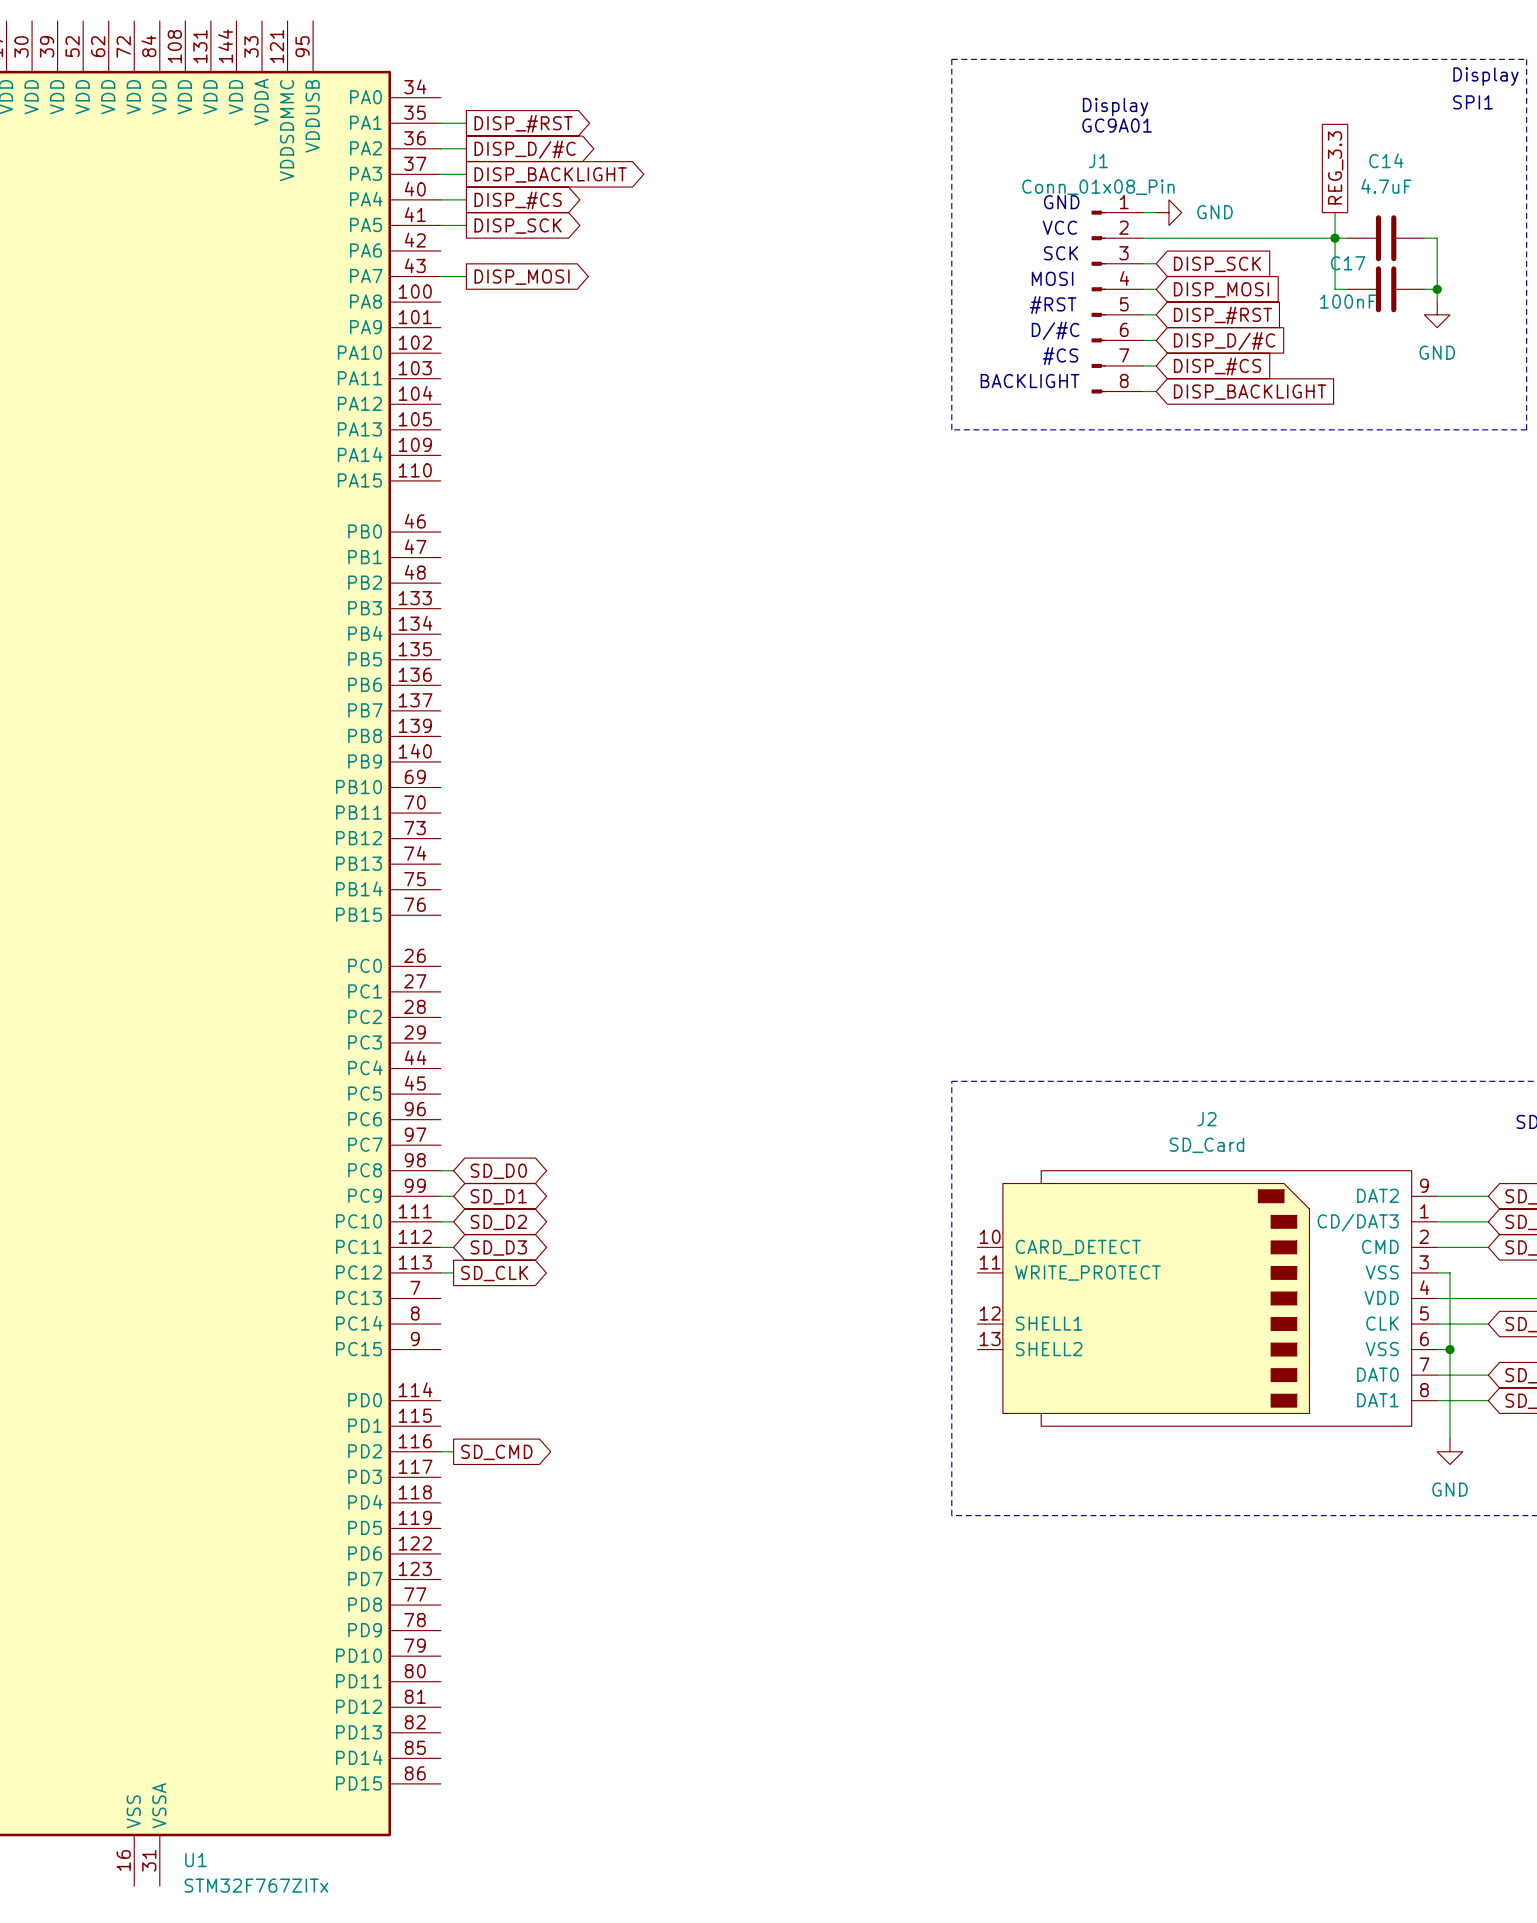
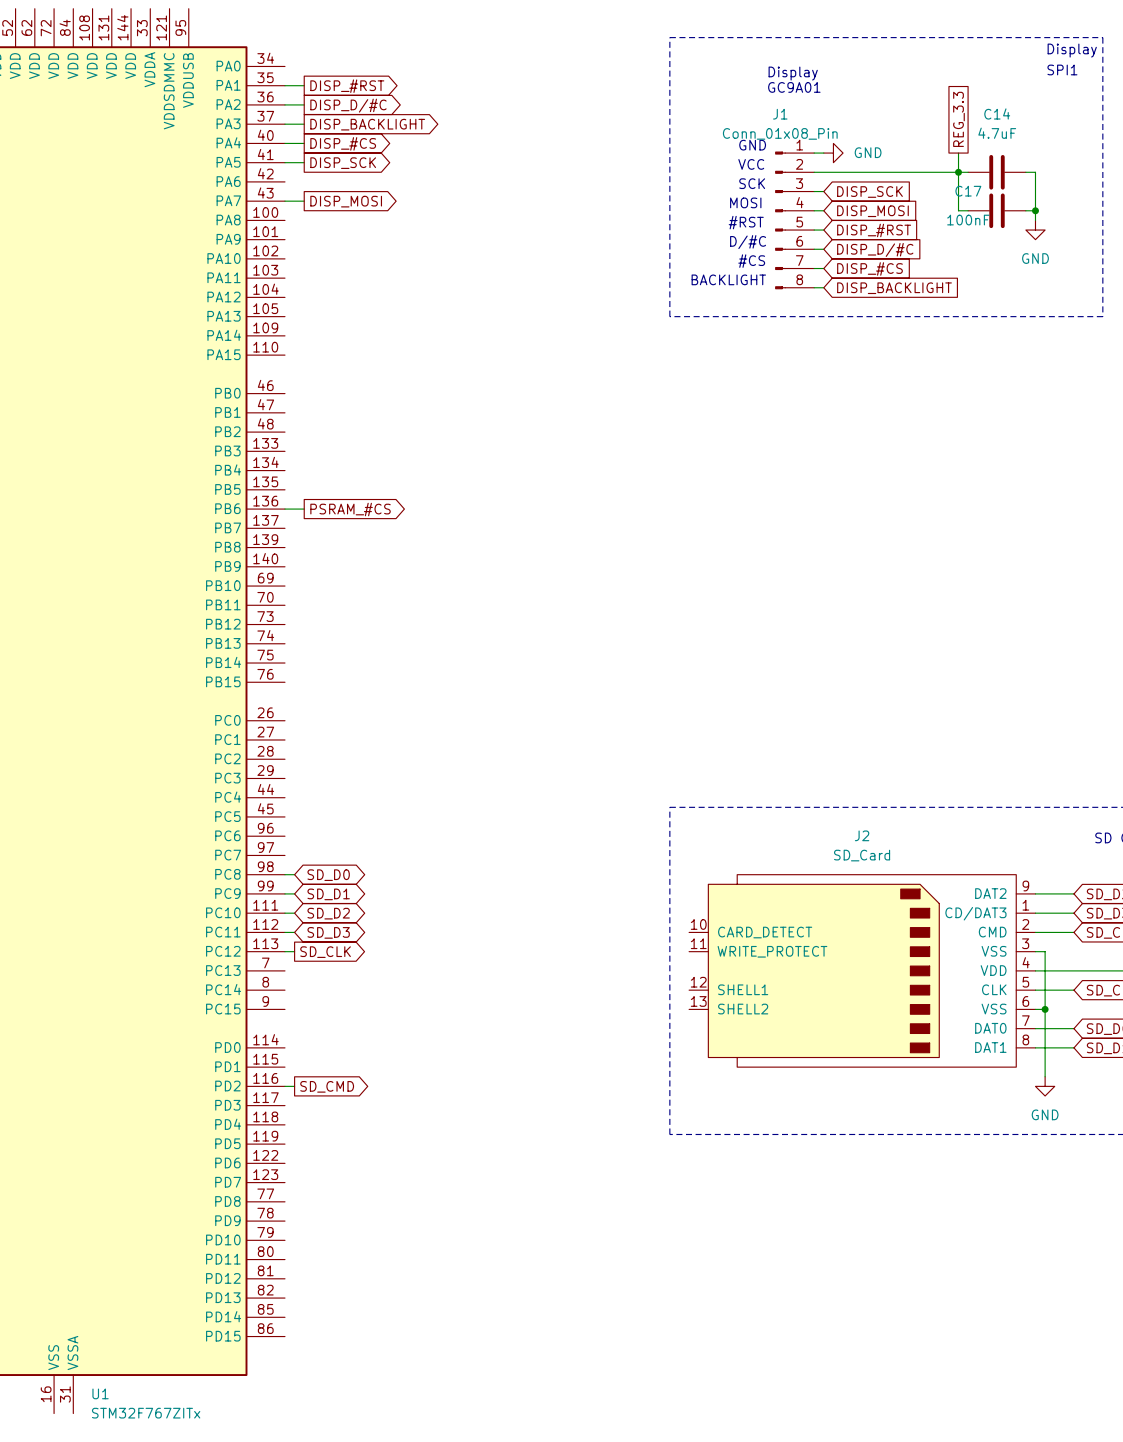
wire: none -> (284, 509) (304, 509)
global label: none -> PSRAM_#CS (350, 509)

